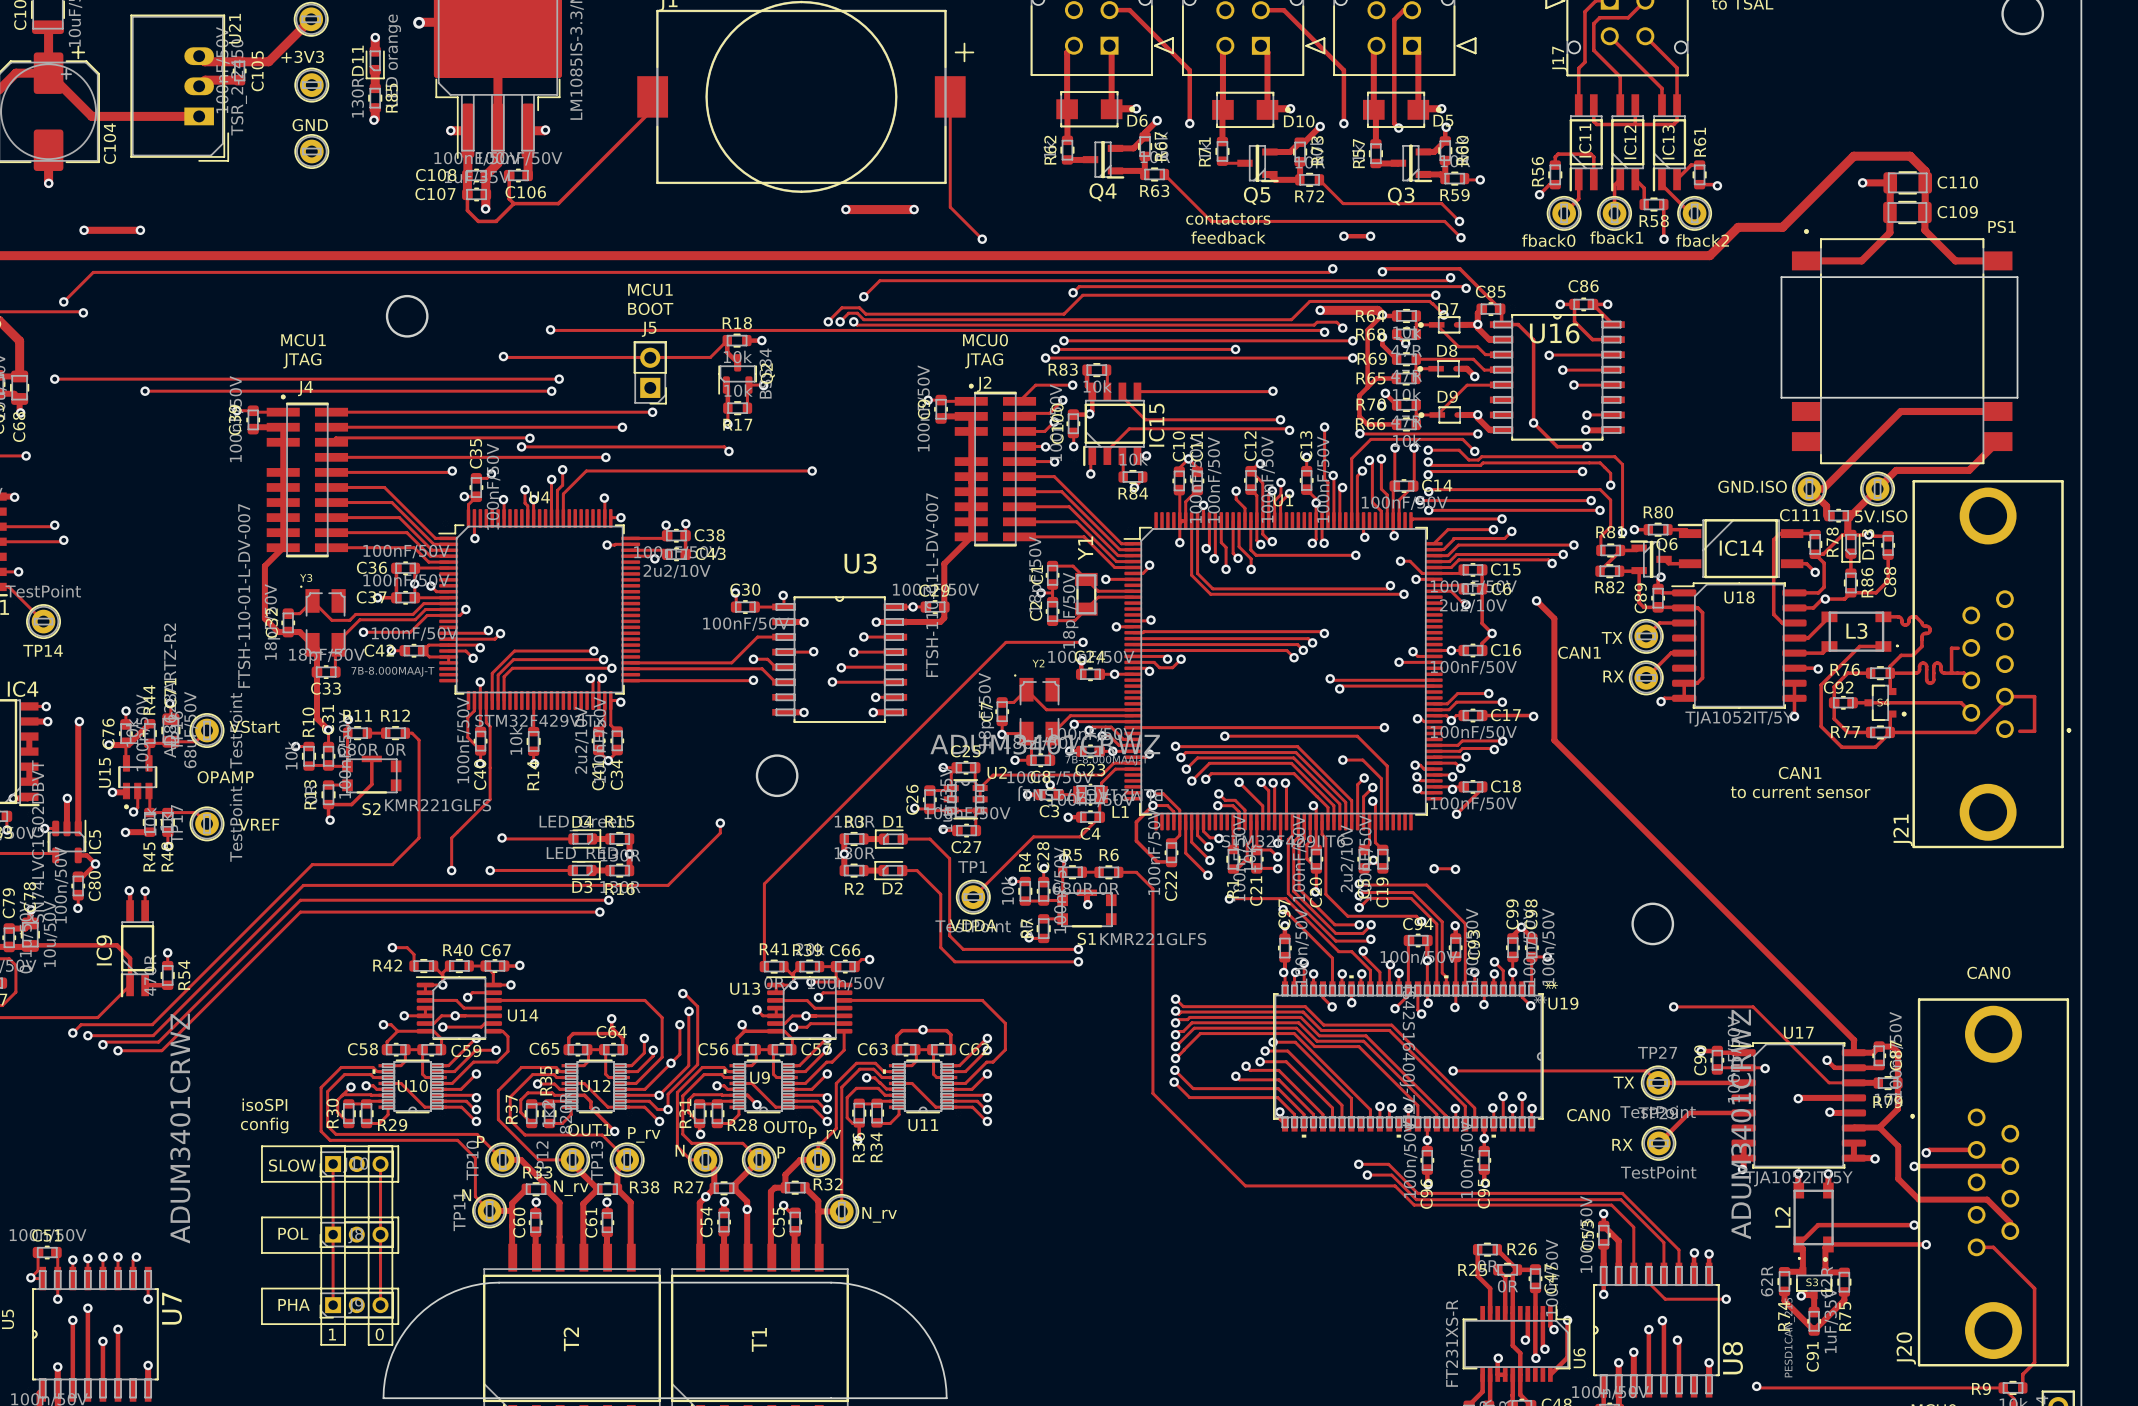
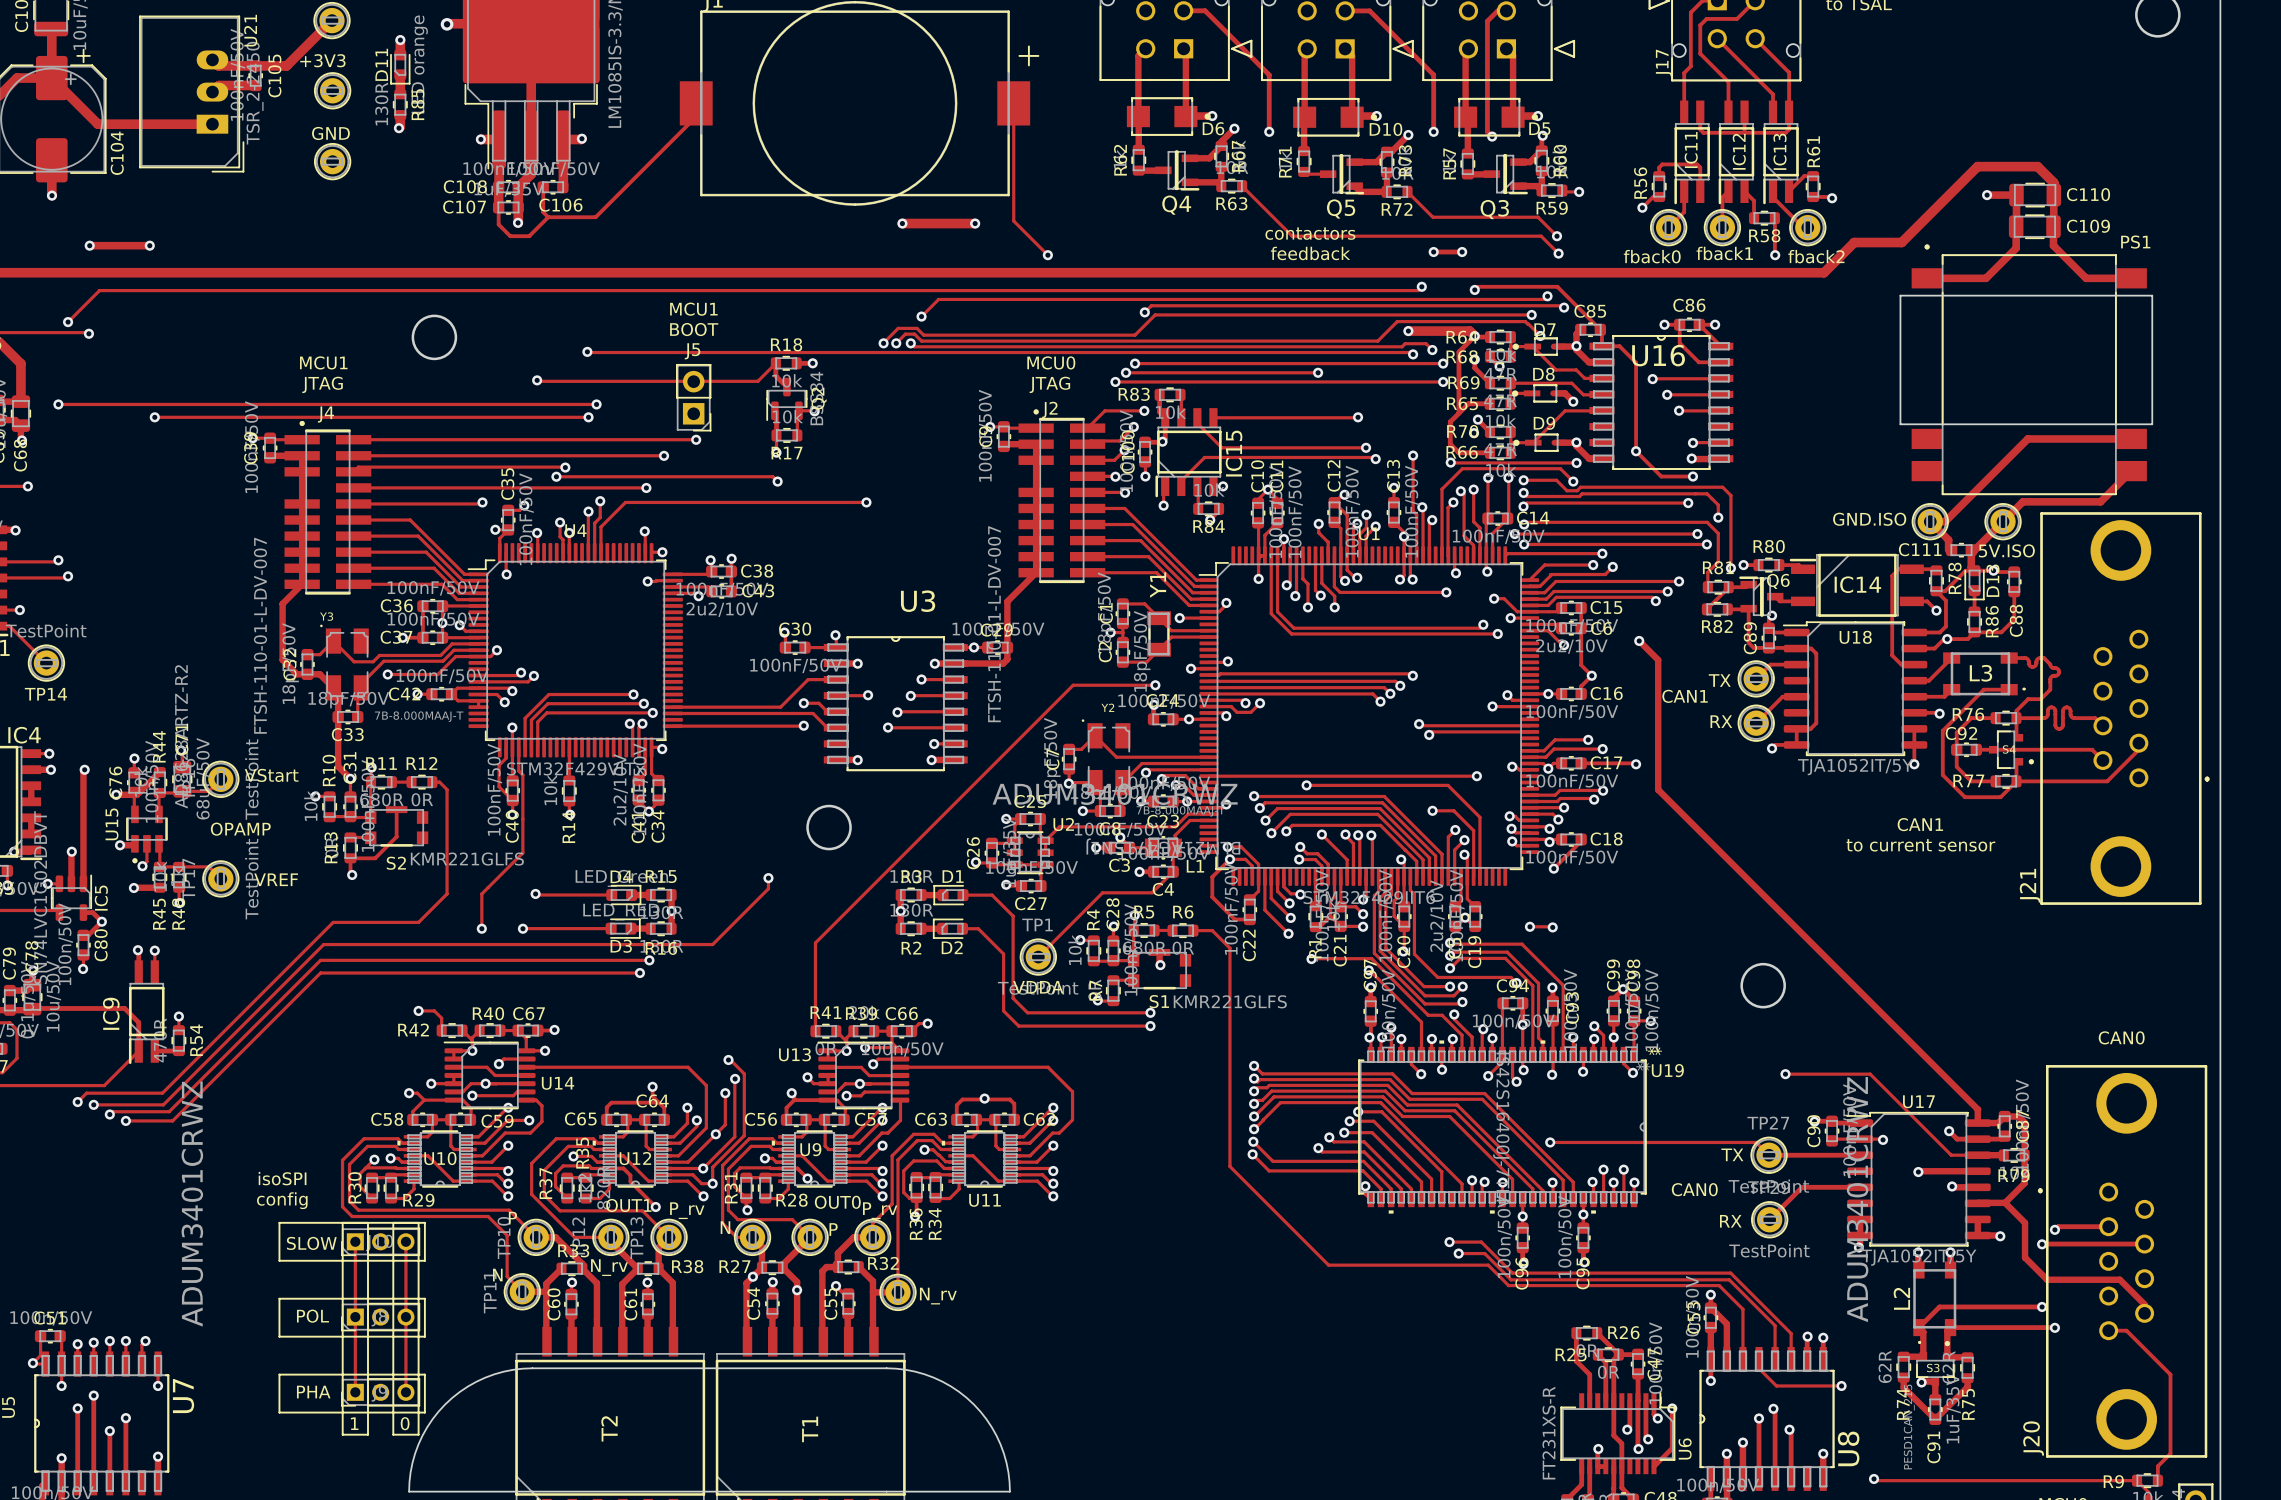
track: (1958, 648) (1951, 648) (1951, 673) -> none
track: (2004, 696) (2034, 696) (2034, 731) (2019, 731) -> none

